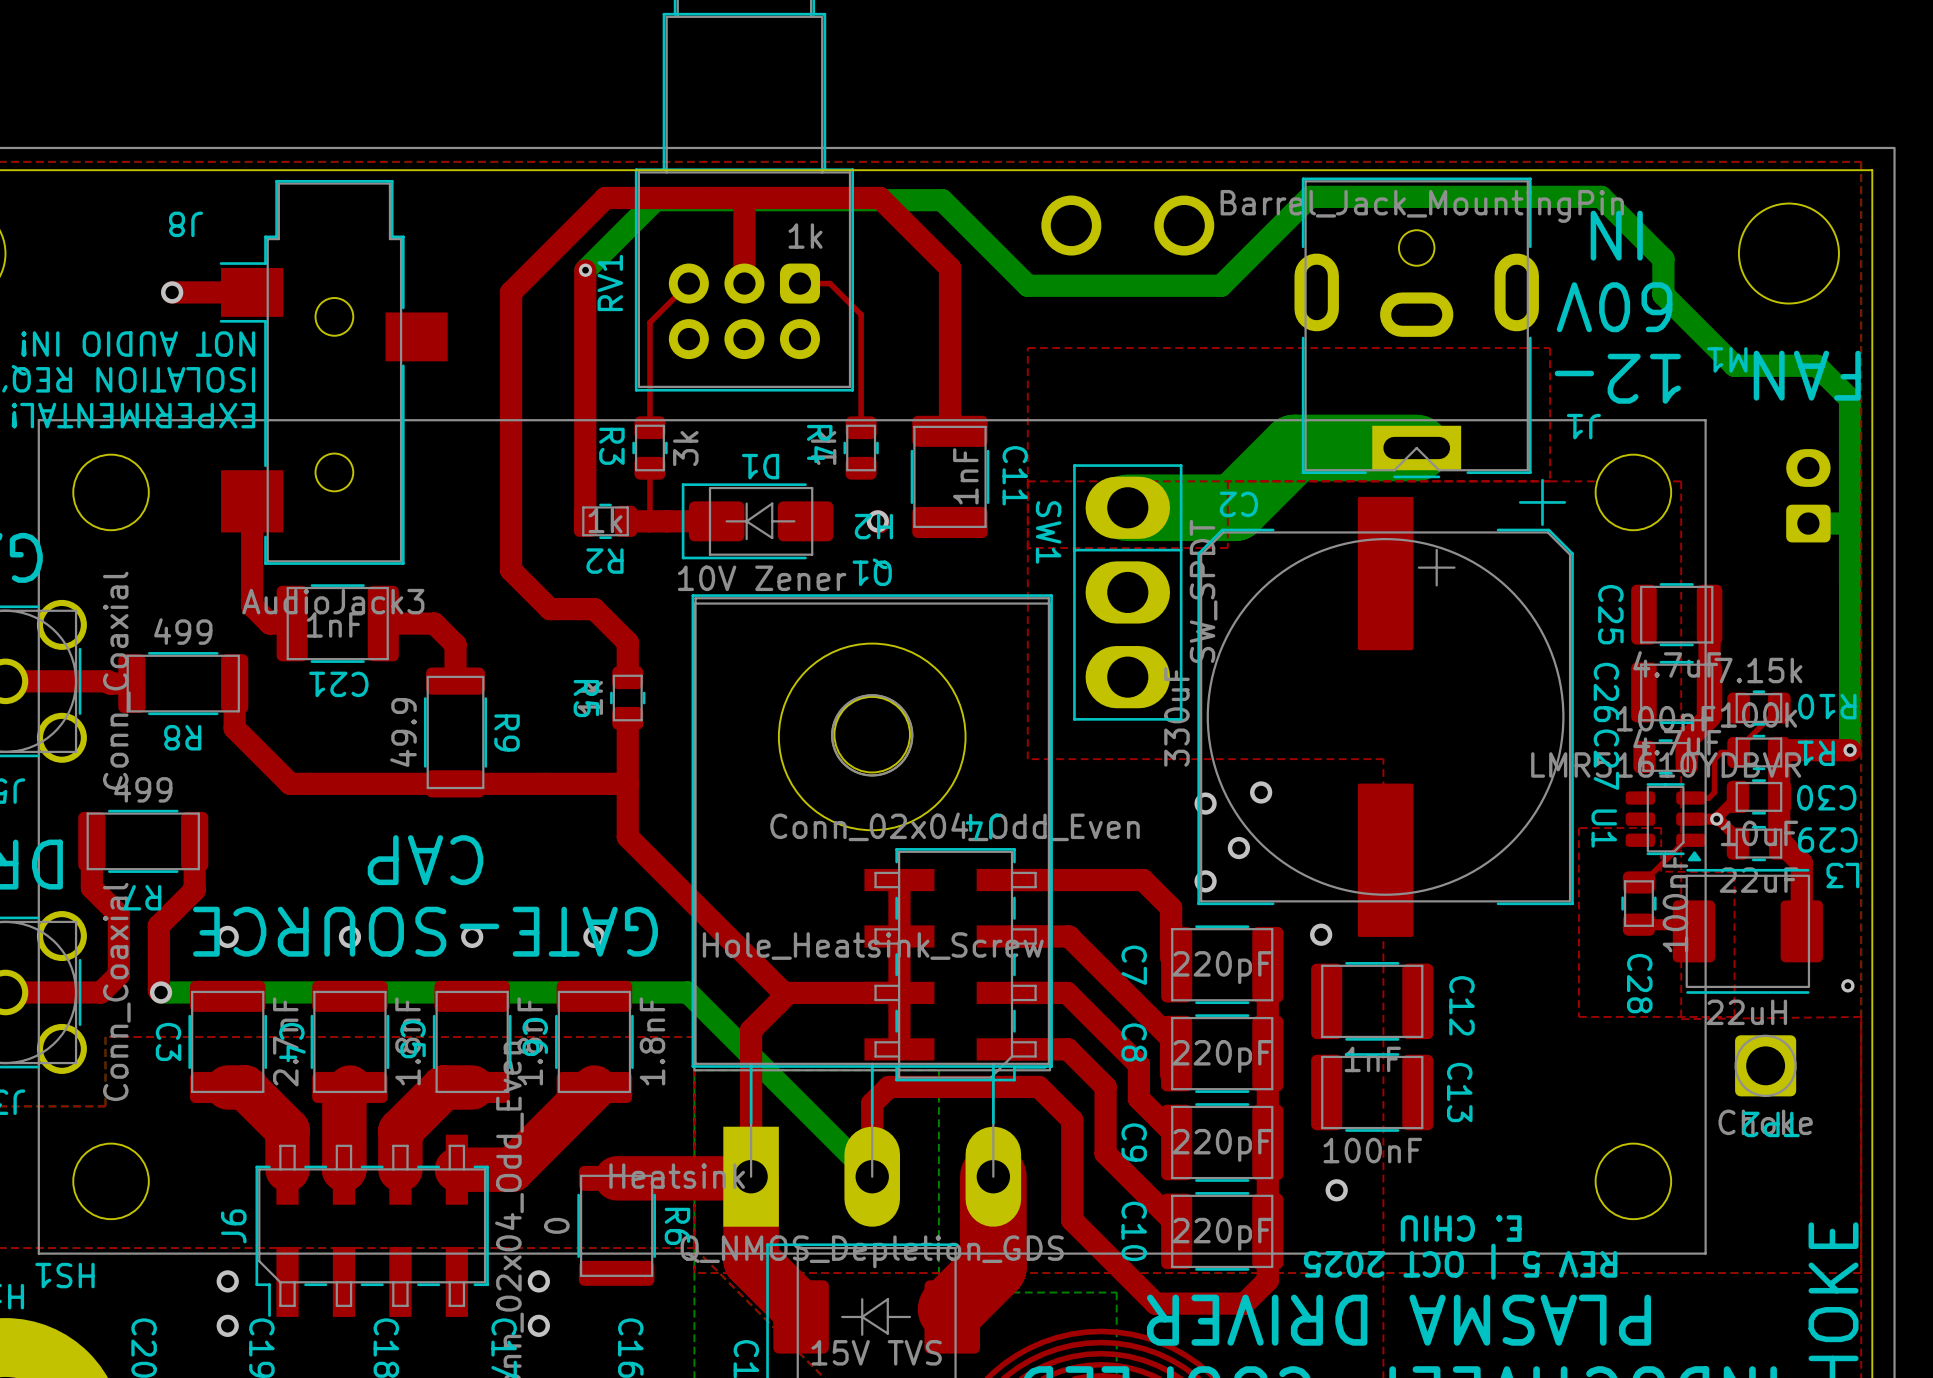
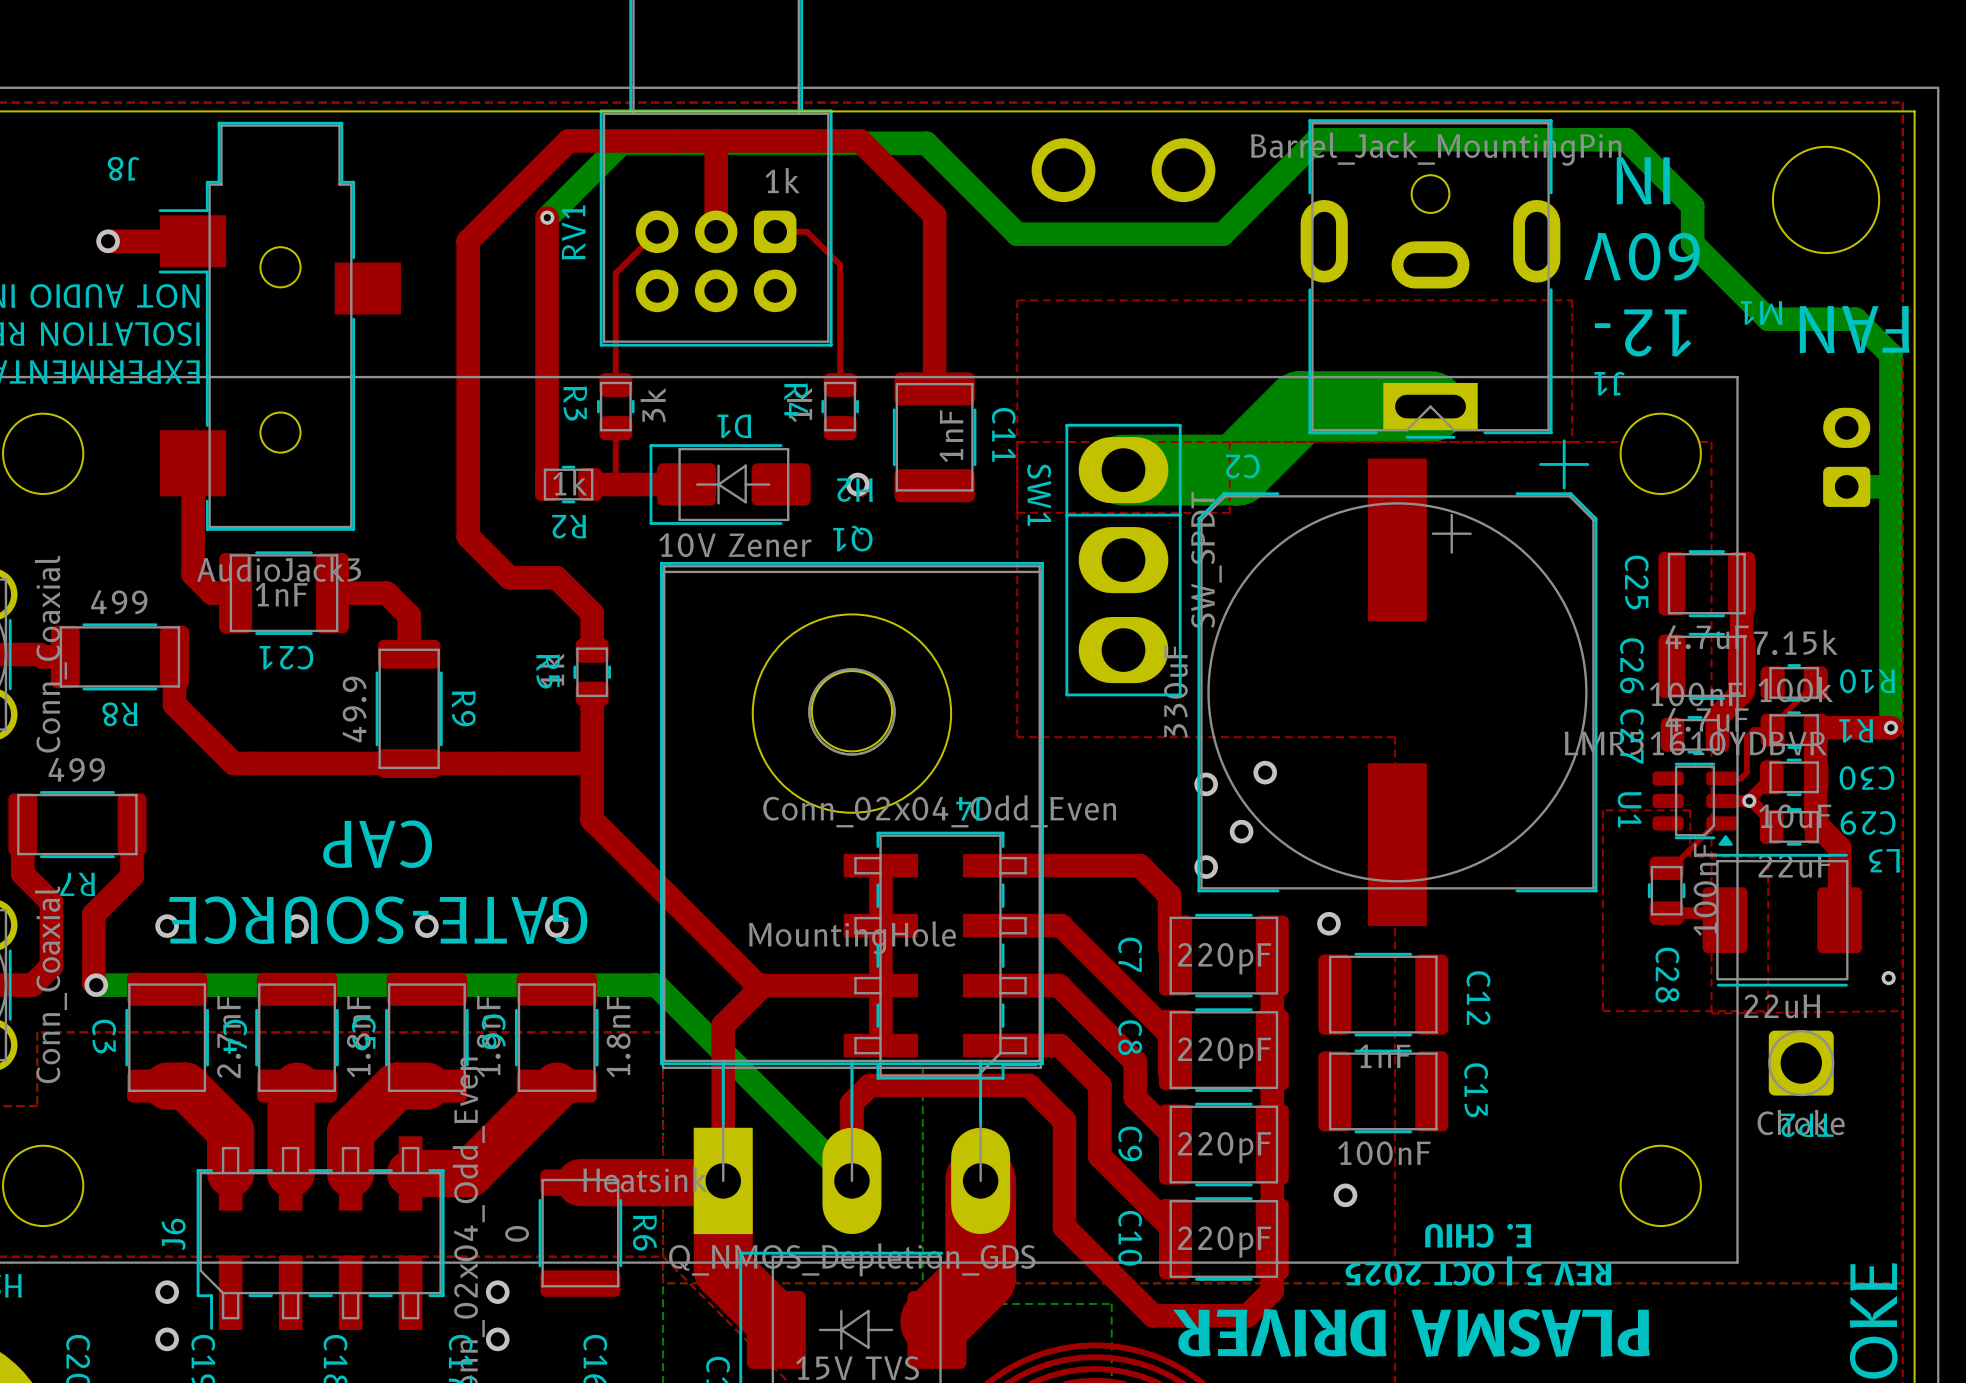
H2 value: Hole_Heatsink_Screw (873, 946) -> MountingHole (852, 937)

